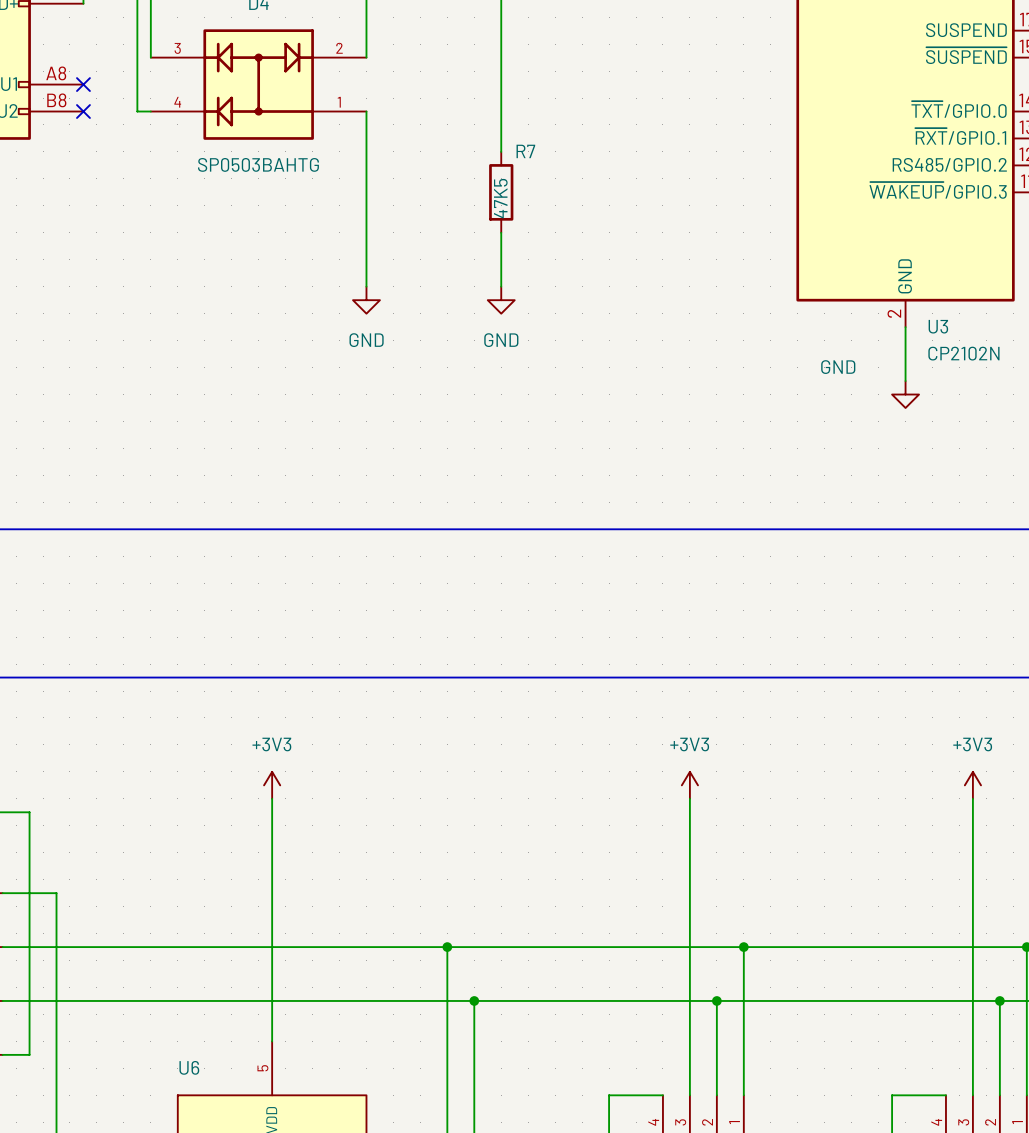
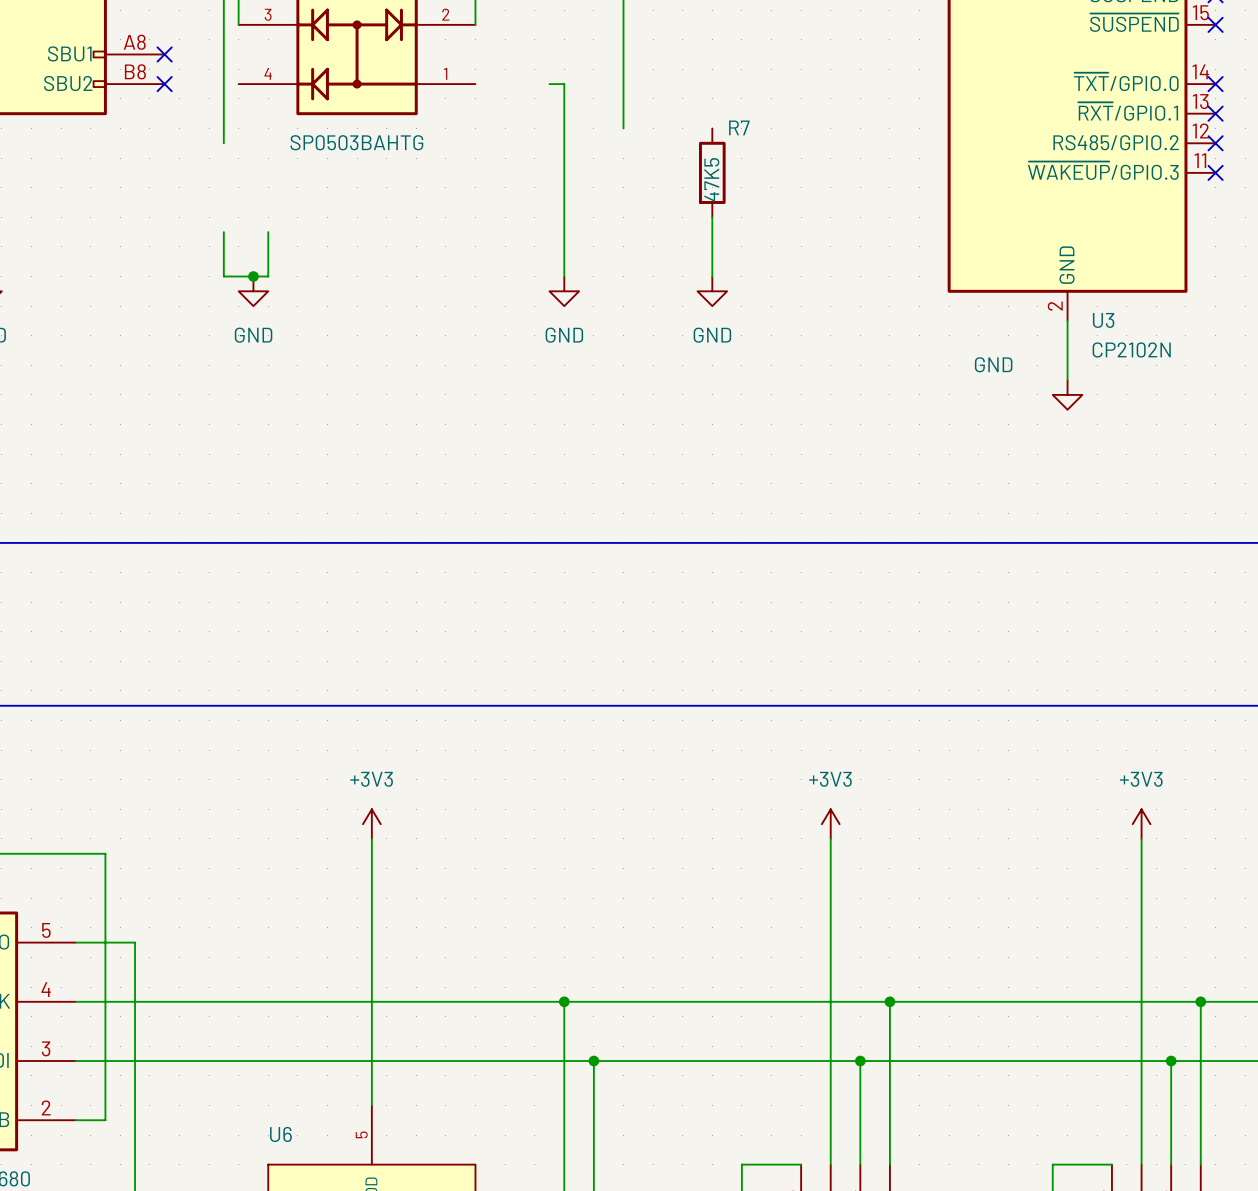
wire: (137, 111) (150, 111) -> (223, 84) (223, 143)
wire: (366, 111) (366, 286) -> none
wire: none -> (549, 84) (564, 84) (564, 276)
R7 position: (501, 192) -> (712, 172)
wire: (501, 232) (501, 286) -> (712, 217) (712, 276)
wire: none -> (223, 232) (223, 276) (268, 276) (268, 232)
junction: none -> (253, 276)
power symbol: none -> GND (253, 291)
power symbol: GND (366, 300) -> none
power symbol: none -> GND (564, 291)
power symbol: GND (501, 300) -> none
power symbol: none -> GND (712, 291)

